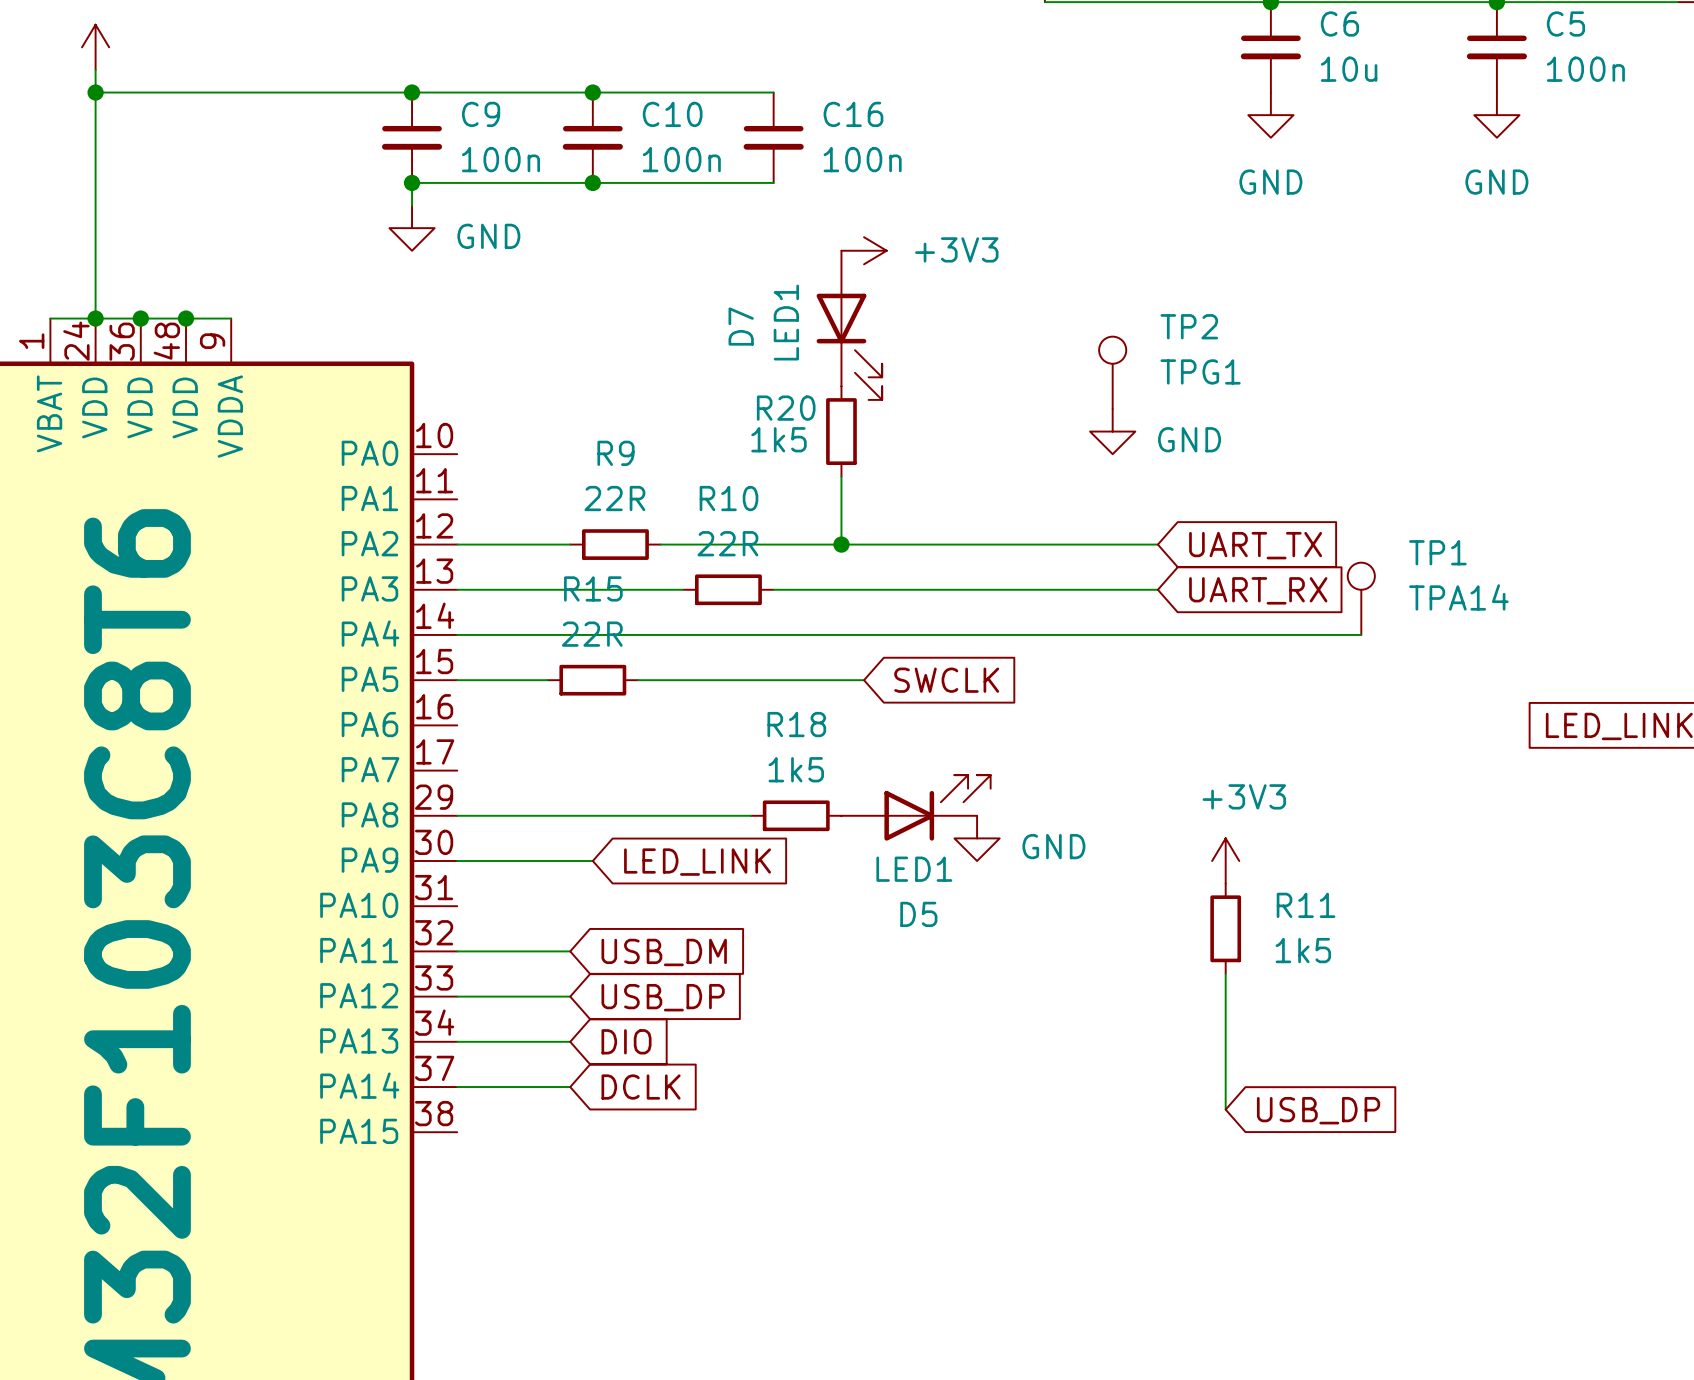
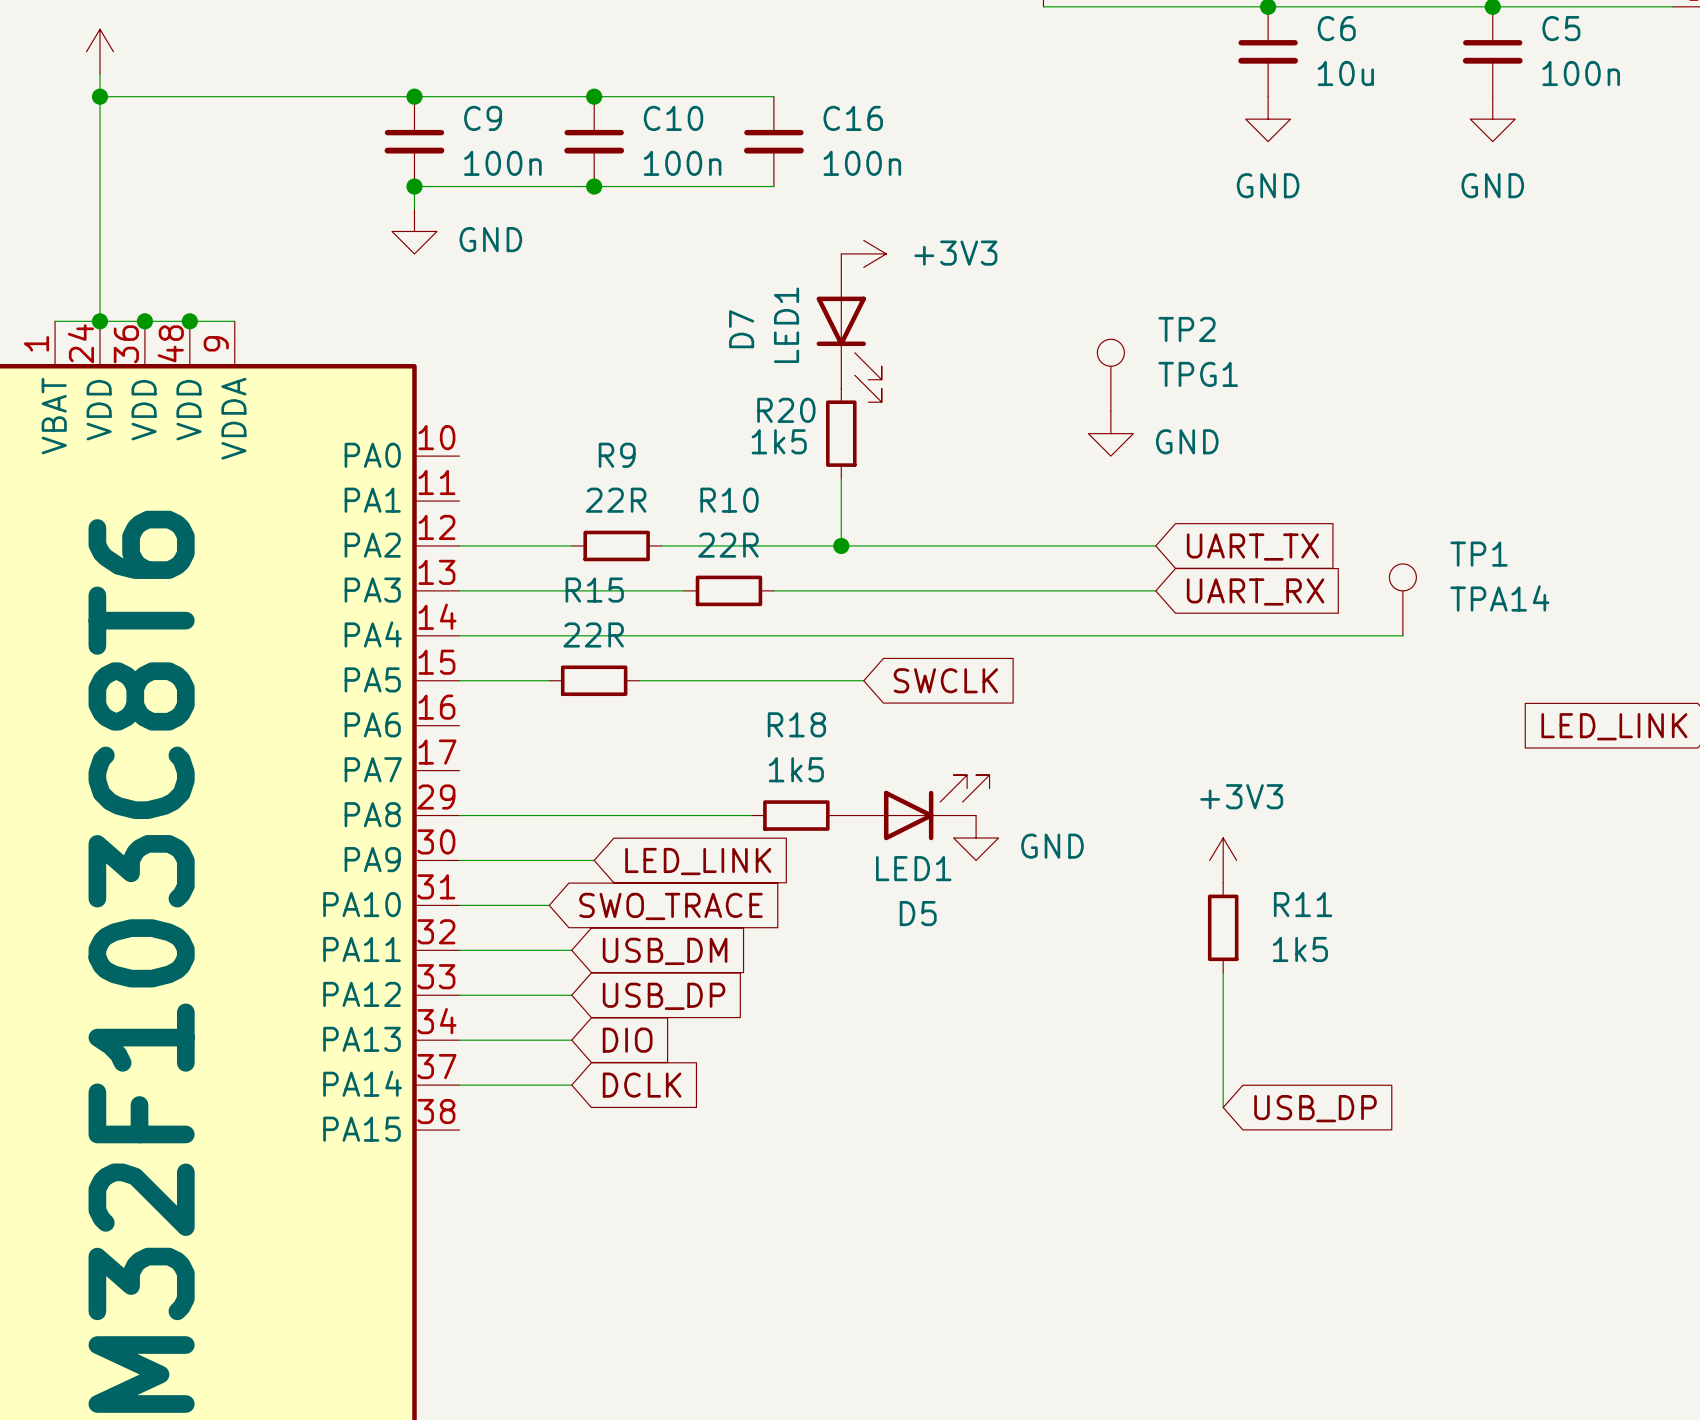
TP1 position: (1361, 598) -> (1402, 599)
wire: none -> (1357, 635) (1402, 635)
wire: none -> (459, 905) (549, 905)
global label: none -> SWO_TRACE (670, 906)

